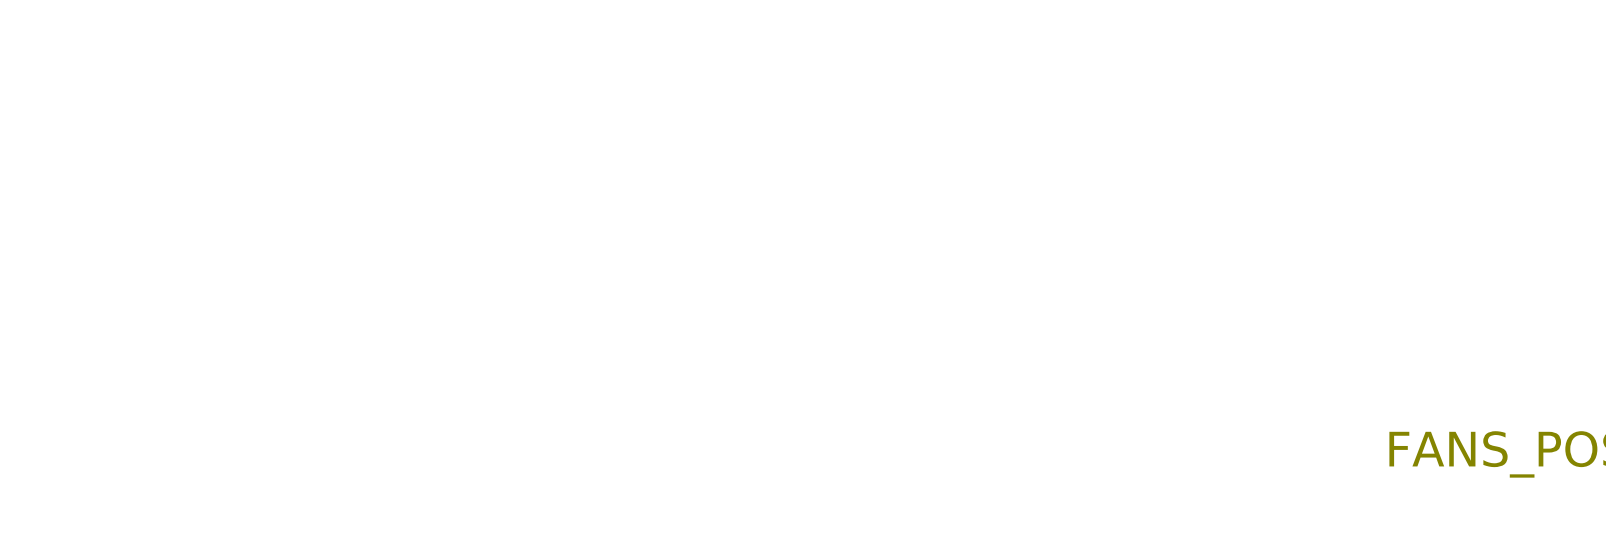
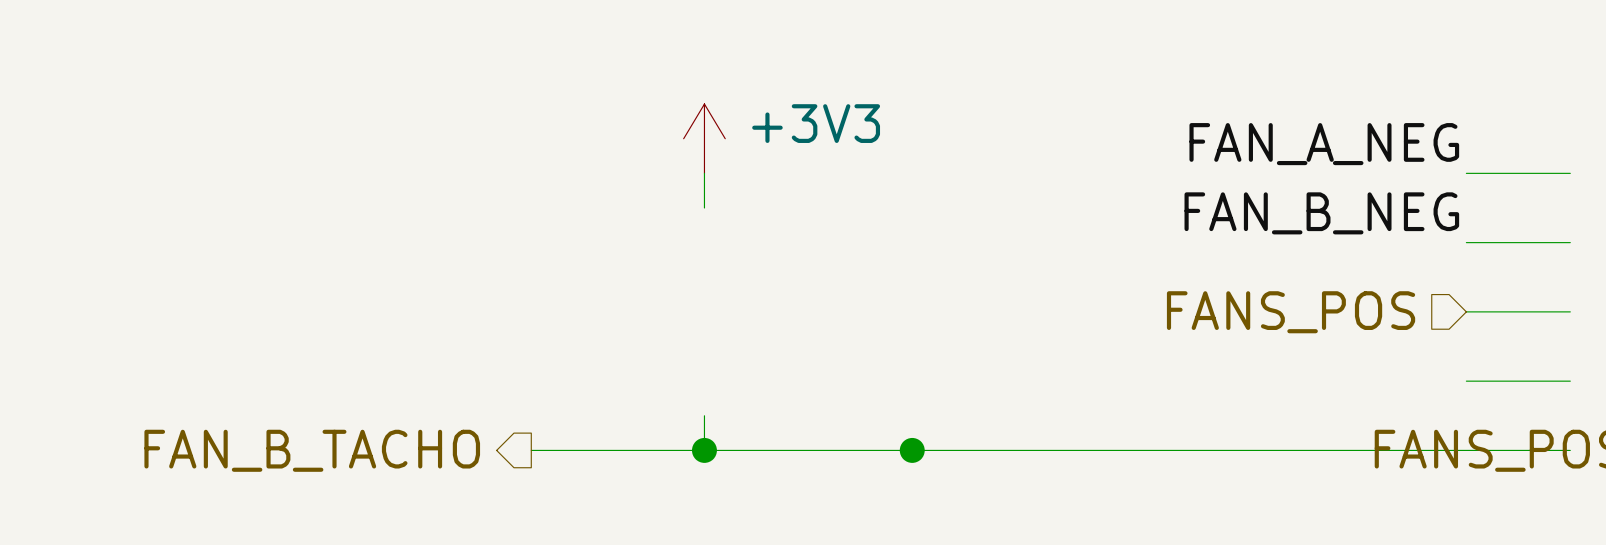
power symbol: none -> +3V3 (704, 138)
label: none -> FAN_A_NEG (1324, 144)
wire: none -> (704, 173) (704, 207)
wire: none -> (1466, 173) (1570, 173)
label: none -> FAN_B_NEG (1321, 213)
wire: none -> (1466, 242) (1570, 242)
wire: none -> (1466, 311) (1570, 311)
hierarchical label: none -> FANS_POS (1291, 312)
wire: none -> (1466, 381) (1570, 381)
wire: none -> (704, 415) (704, 450)
wire: none -> (531, 450) (1570, 450)
junction: none -> (704, 450)
junction: none -> (912, 450)
hierarchical label: none -> FAN_B_TACHO (312, 450)

